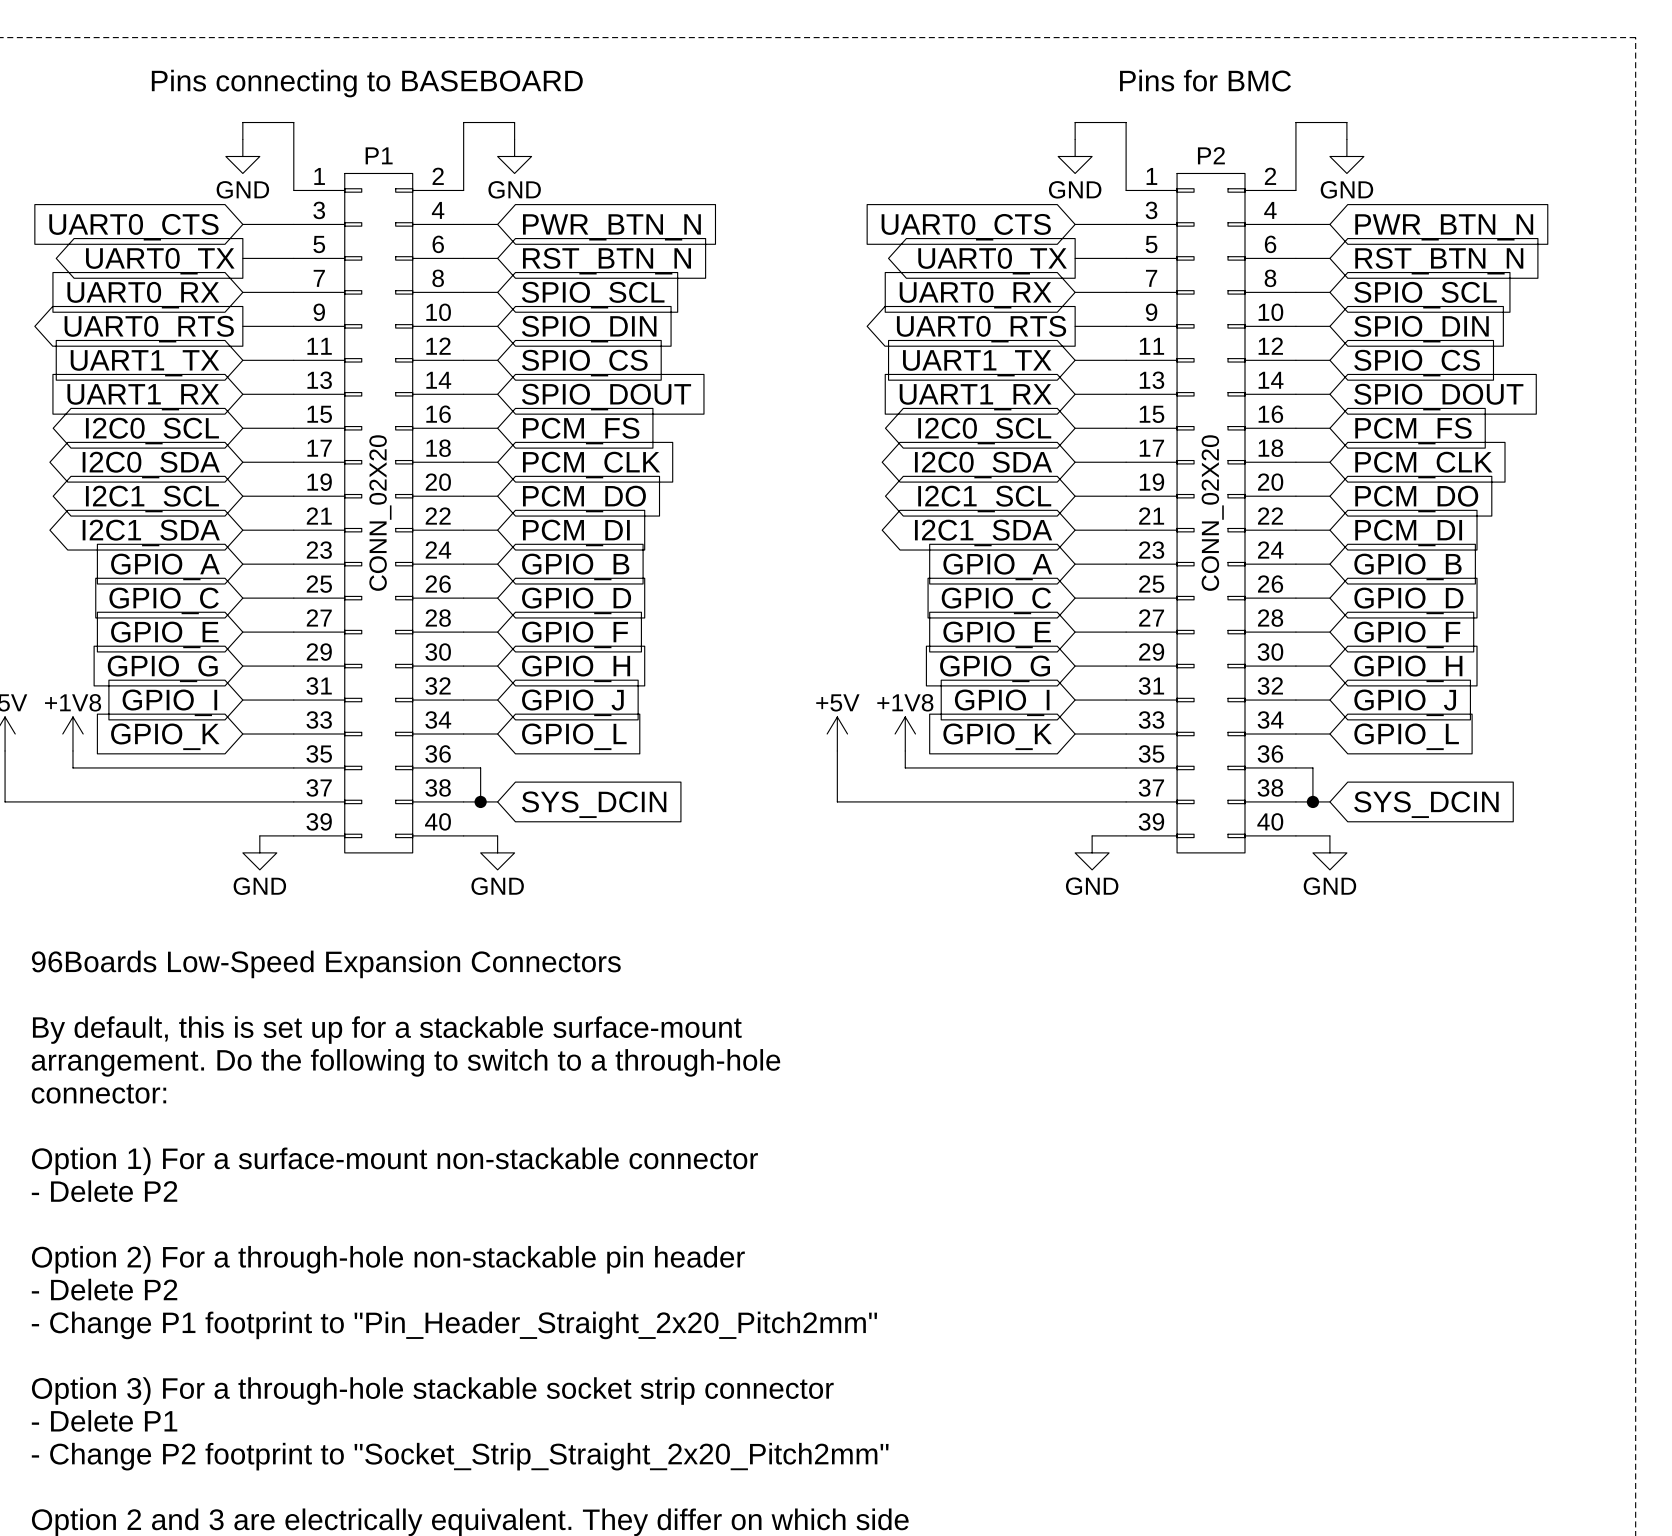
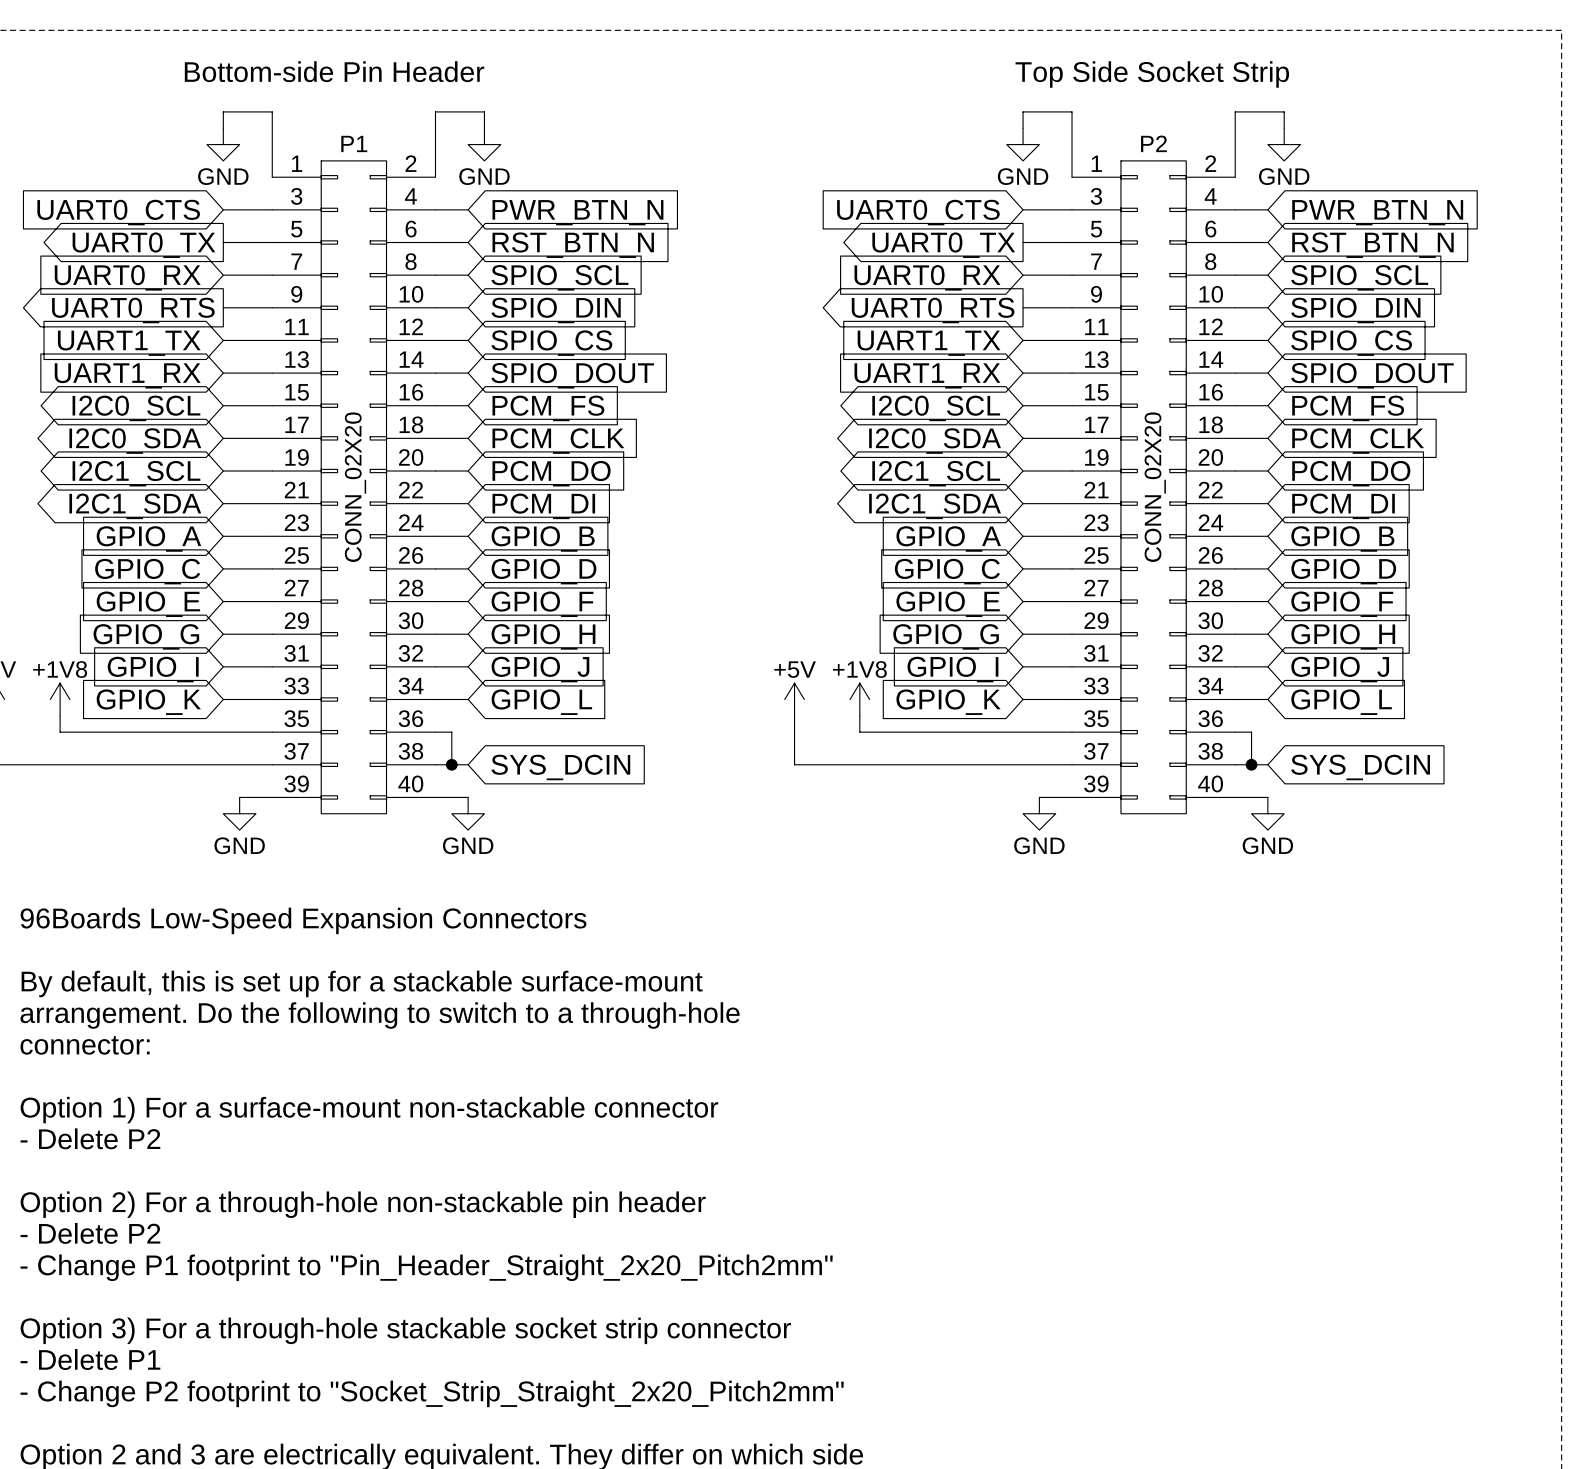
text: none -> Bottom-side Pin Header (334, 71)
text: Pins for BMC (1205, 80) -> none
text: Pins connecting to BASEBOARD (367, 83) -> none
text: none -> Top Side Socket Strip (1152, 74)

